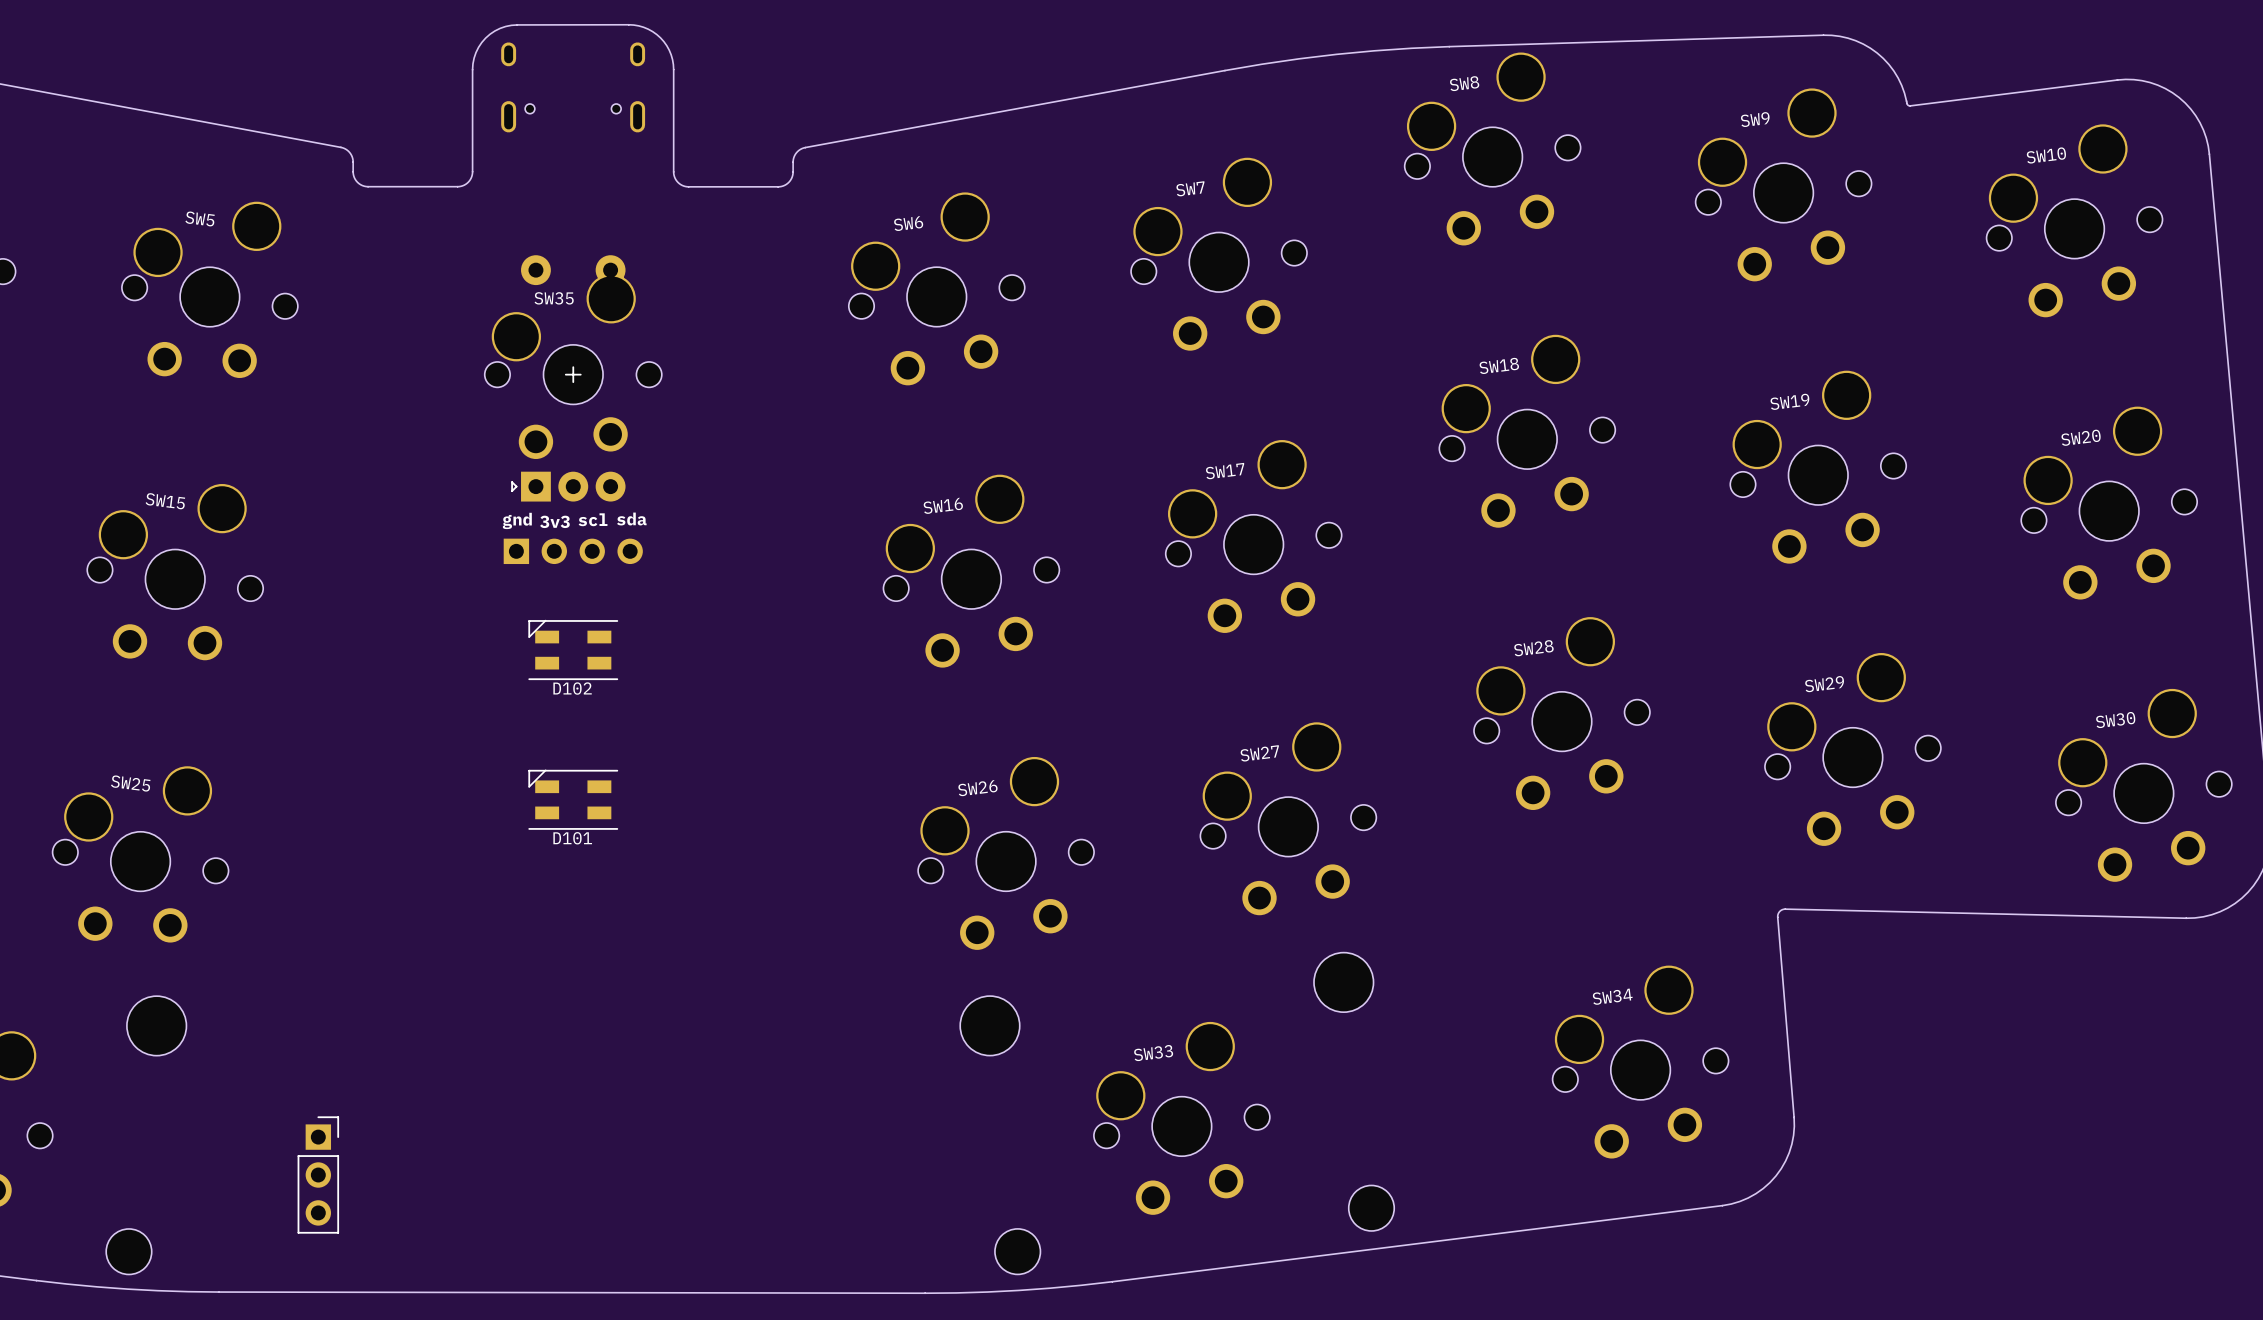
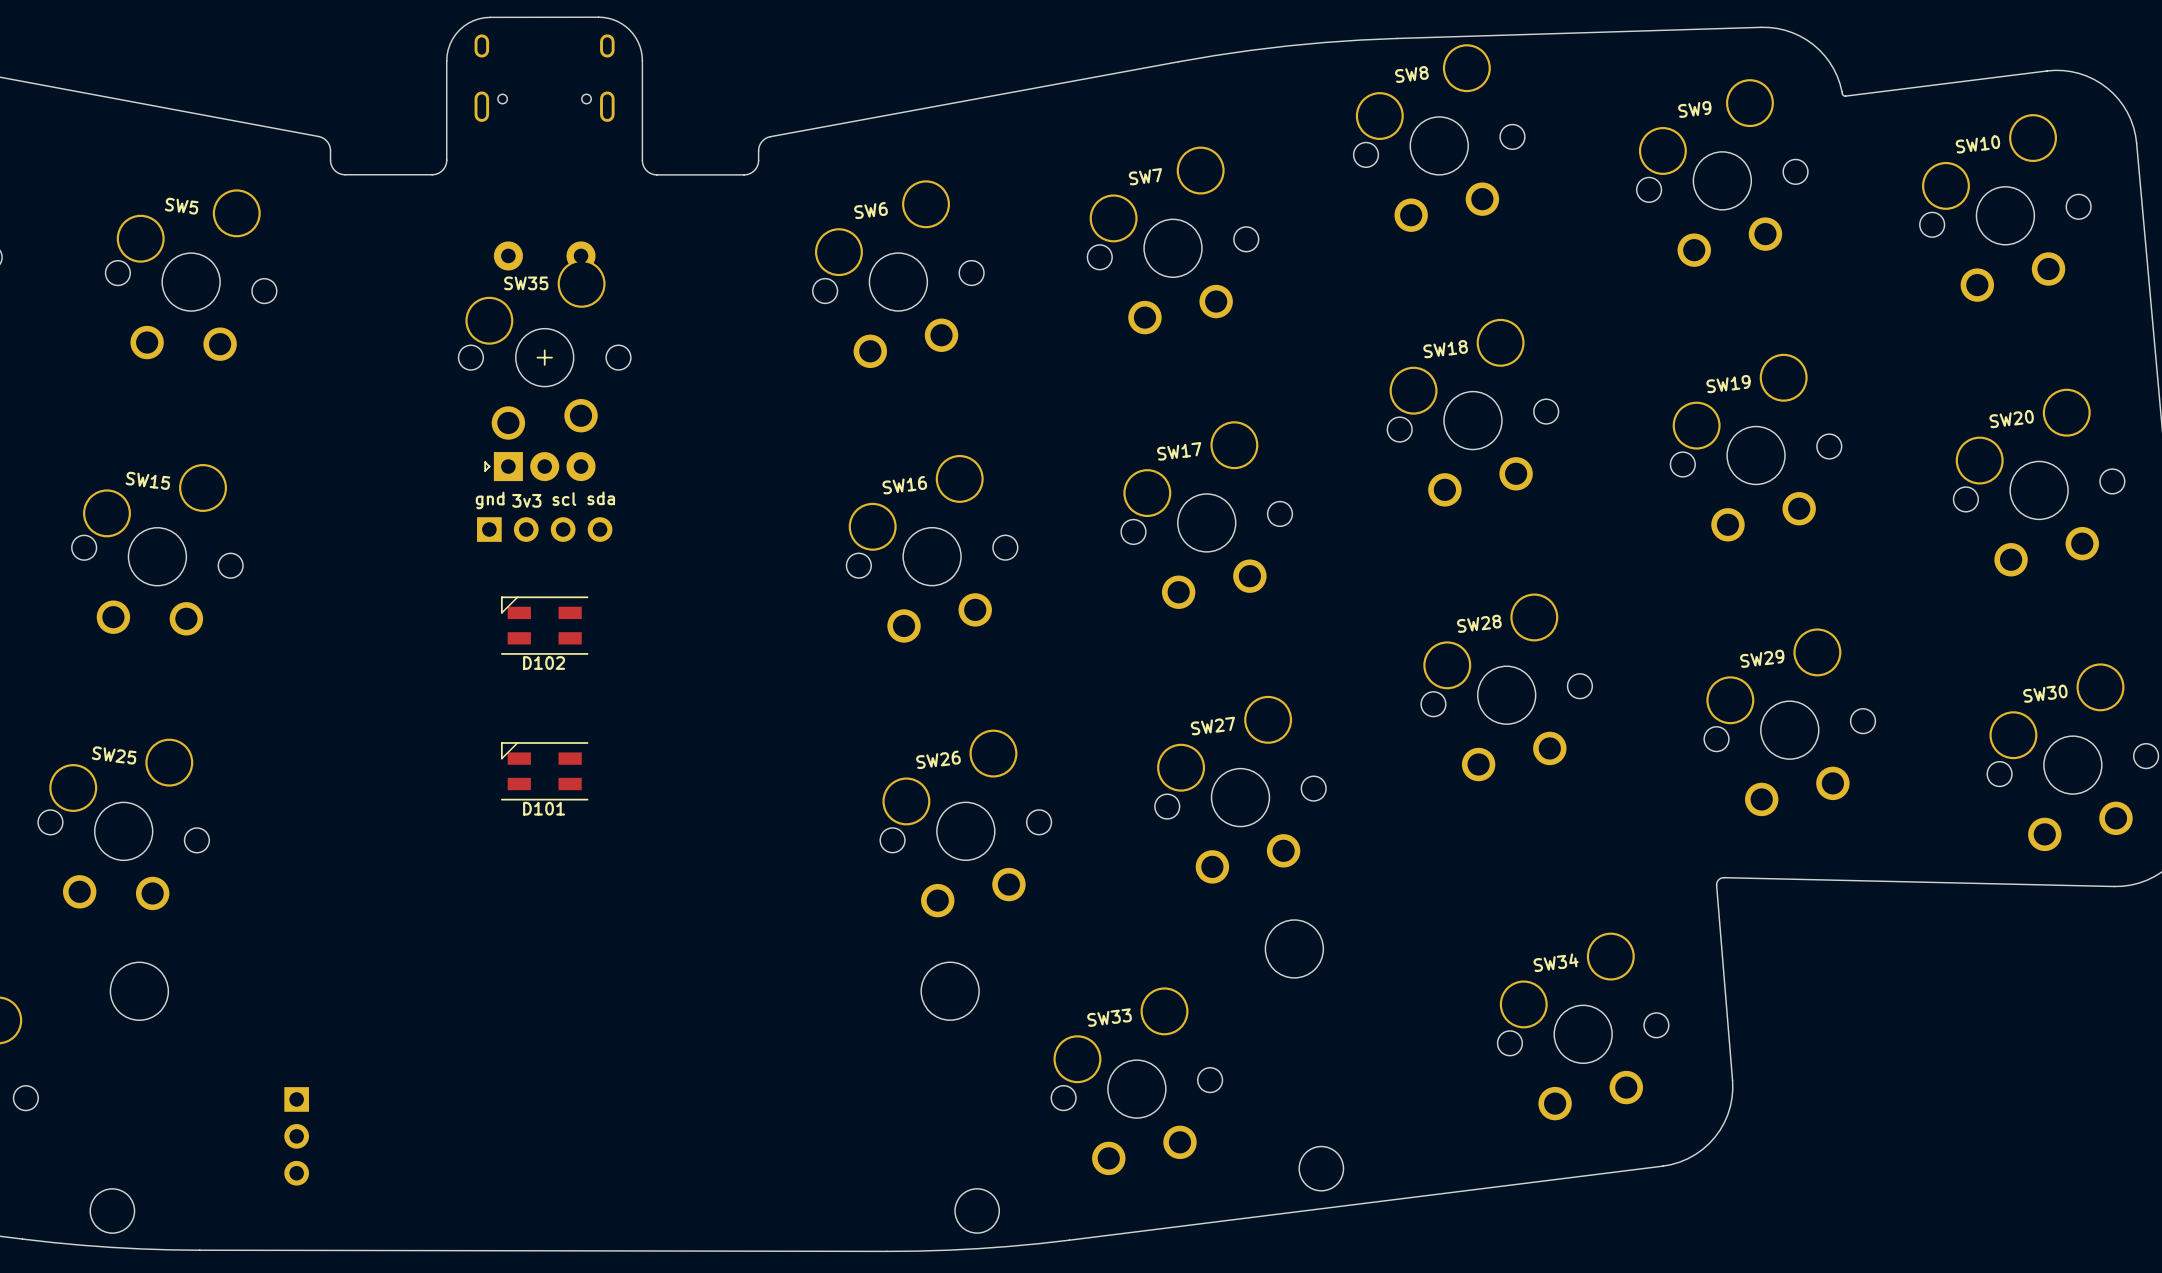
part footprint: [297, 1116, 340, 1234] -> [284, 1087, 310, 1186]

